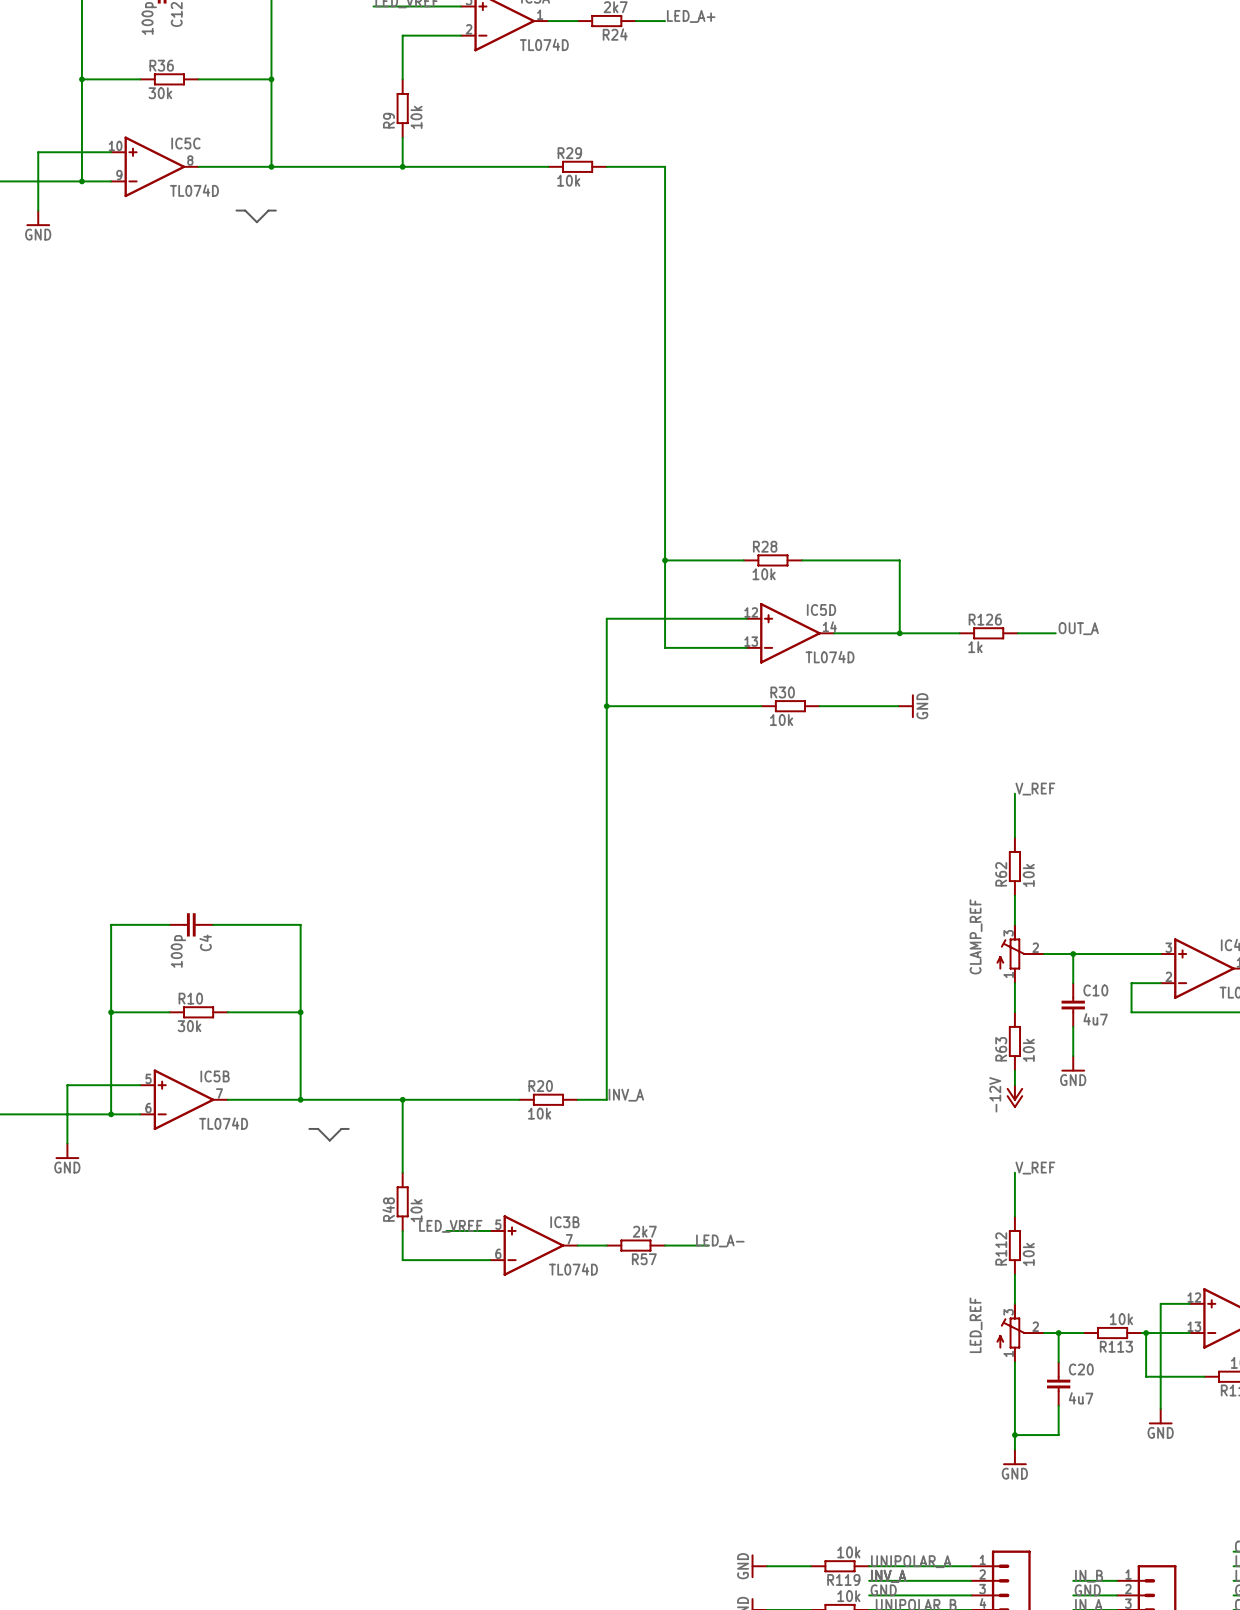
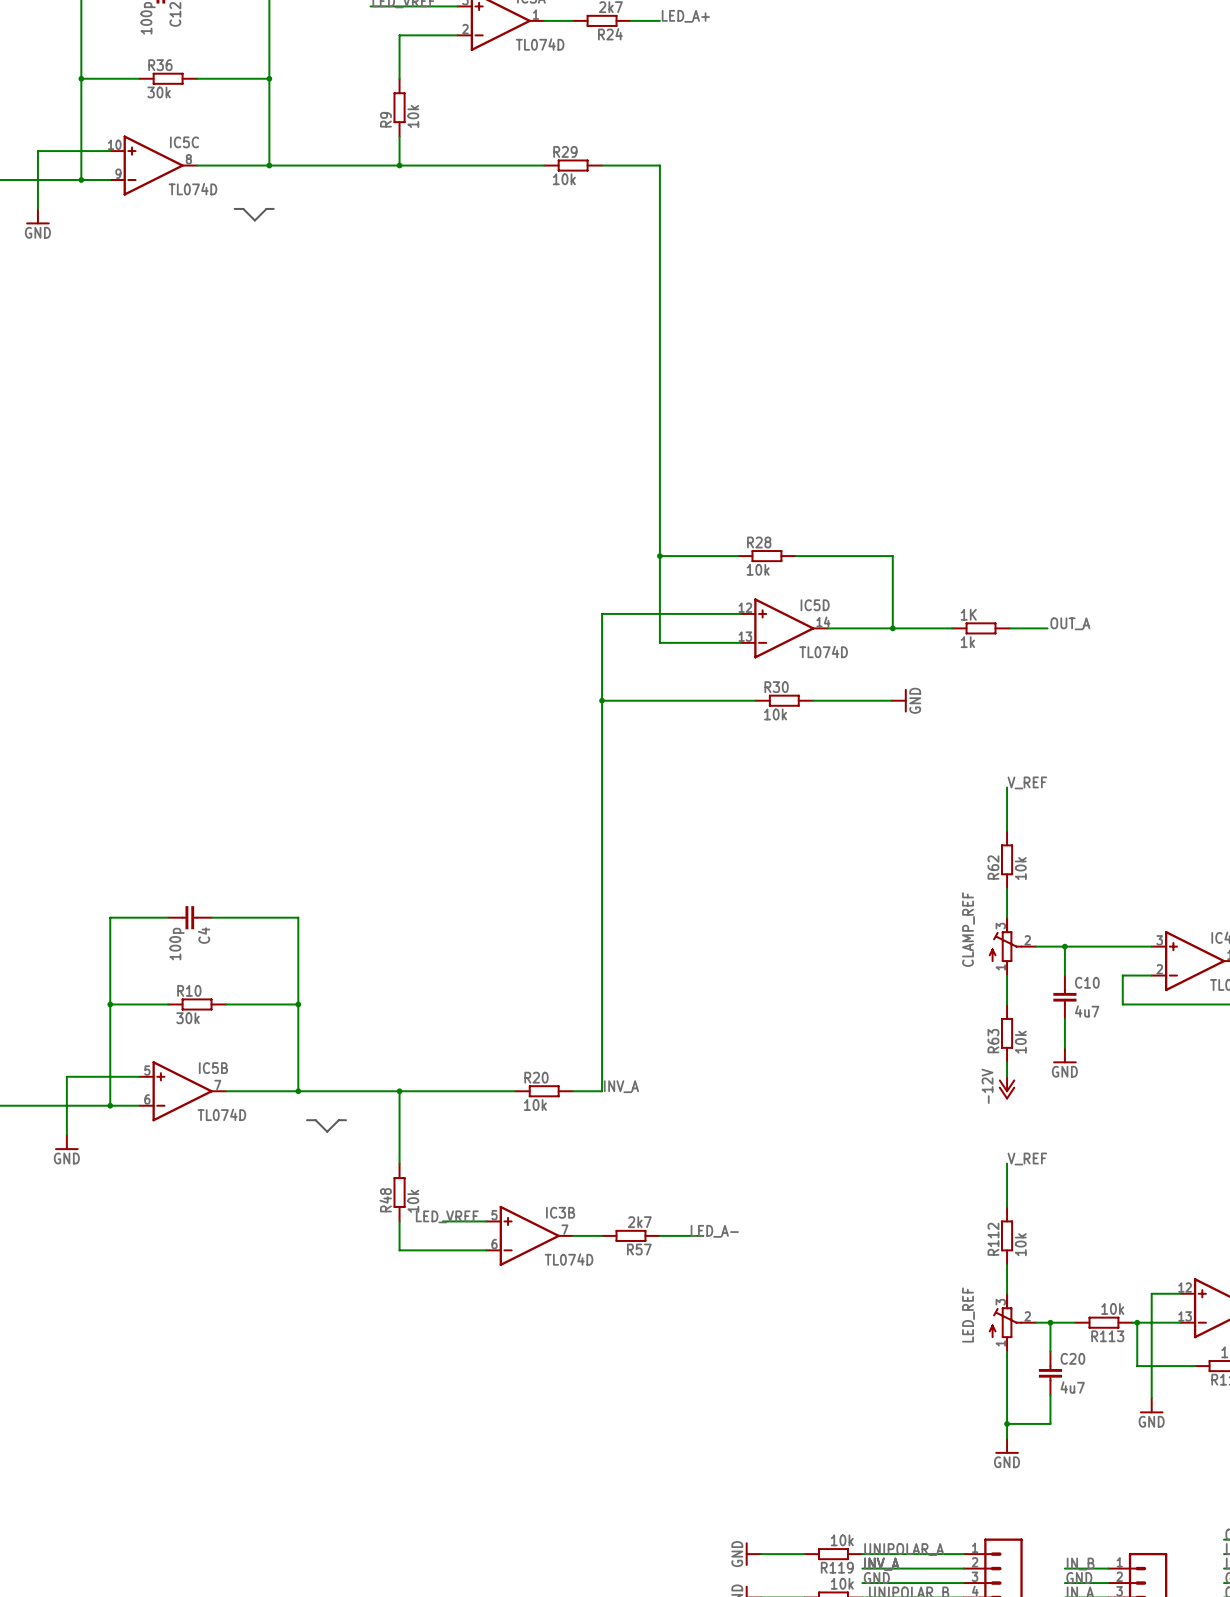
R126 name: R126 (985, 619) -> 1K (968, 614)

